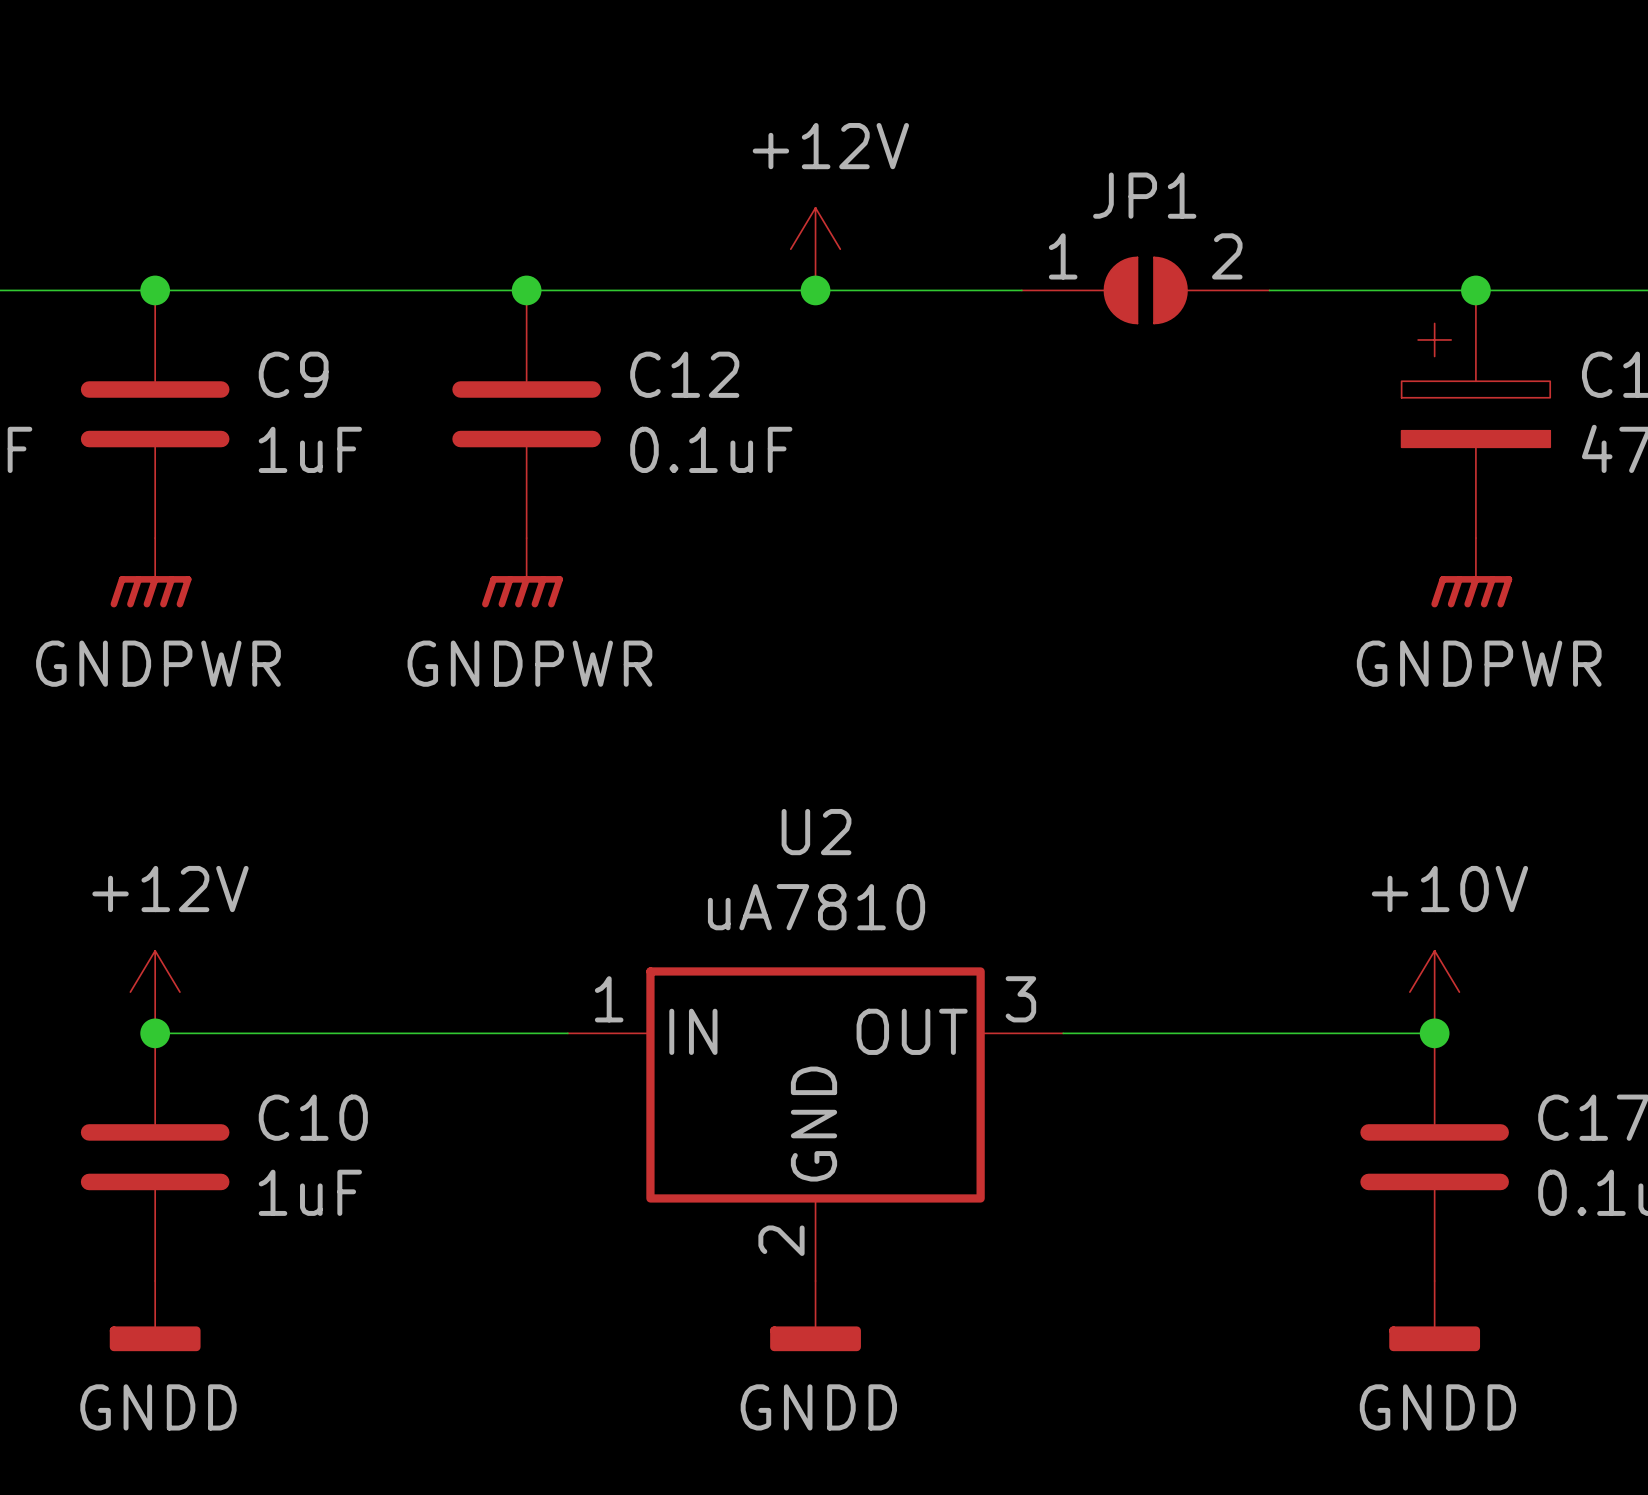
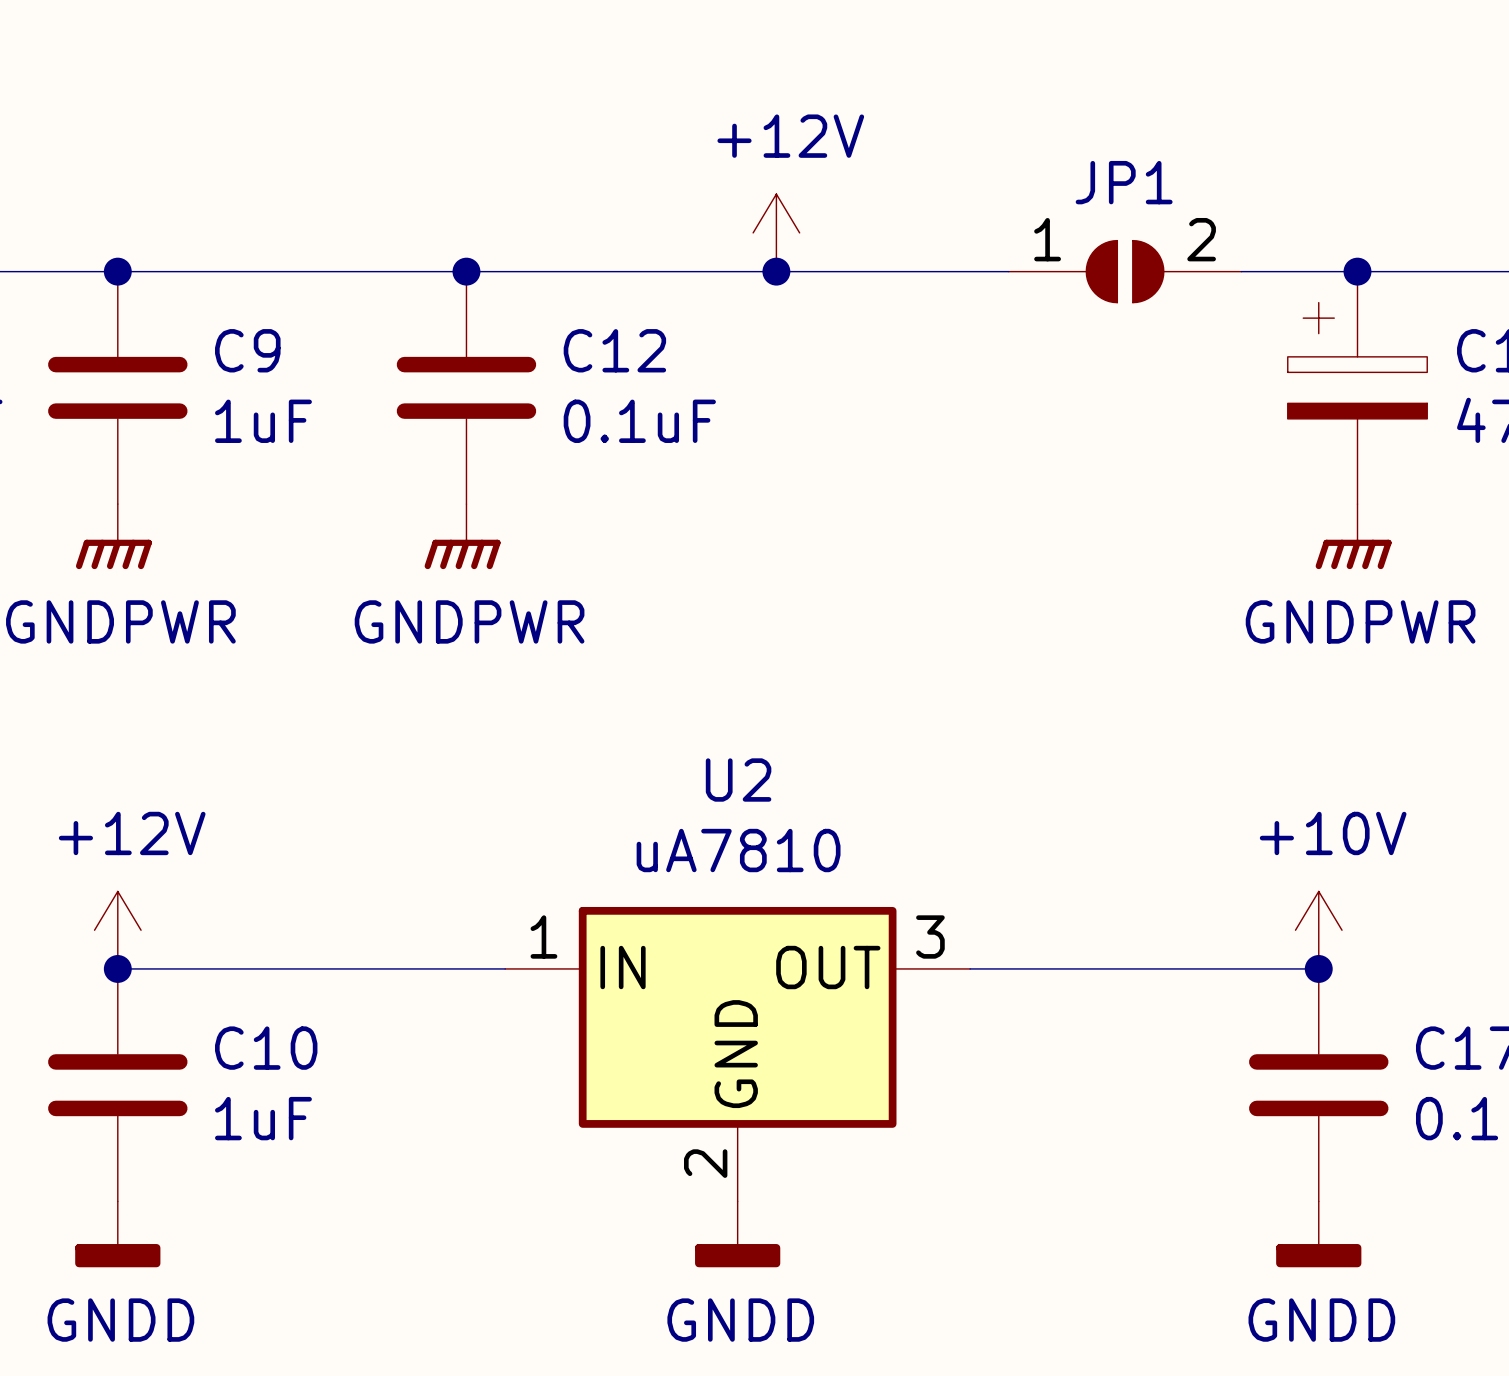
power symbol position: +12V (815, 249) -> +12V (776, 232)
junction position: (815, 290) -> (776, 271)
JP1 position: (1145, 290) -> (1125, 271)

